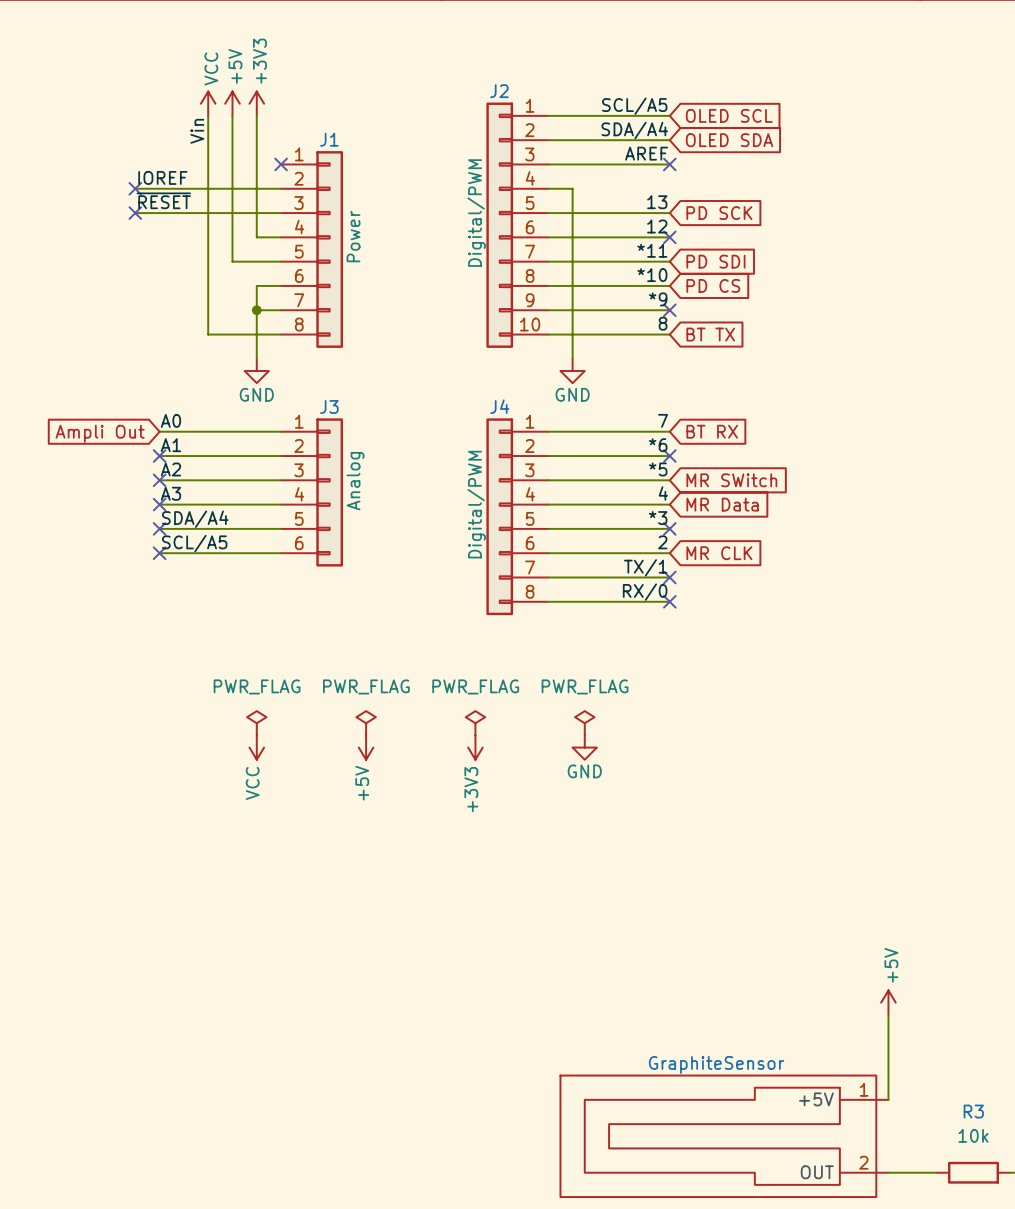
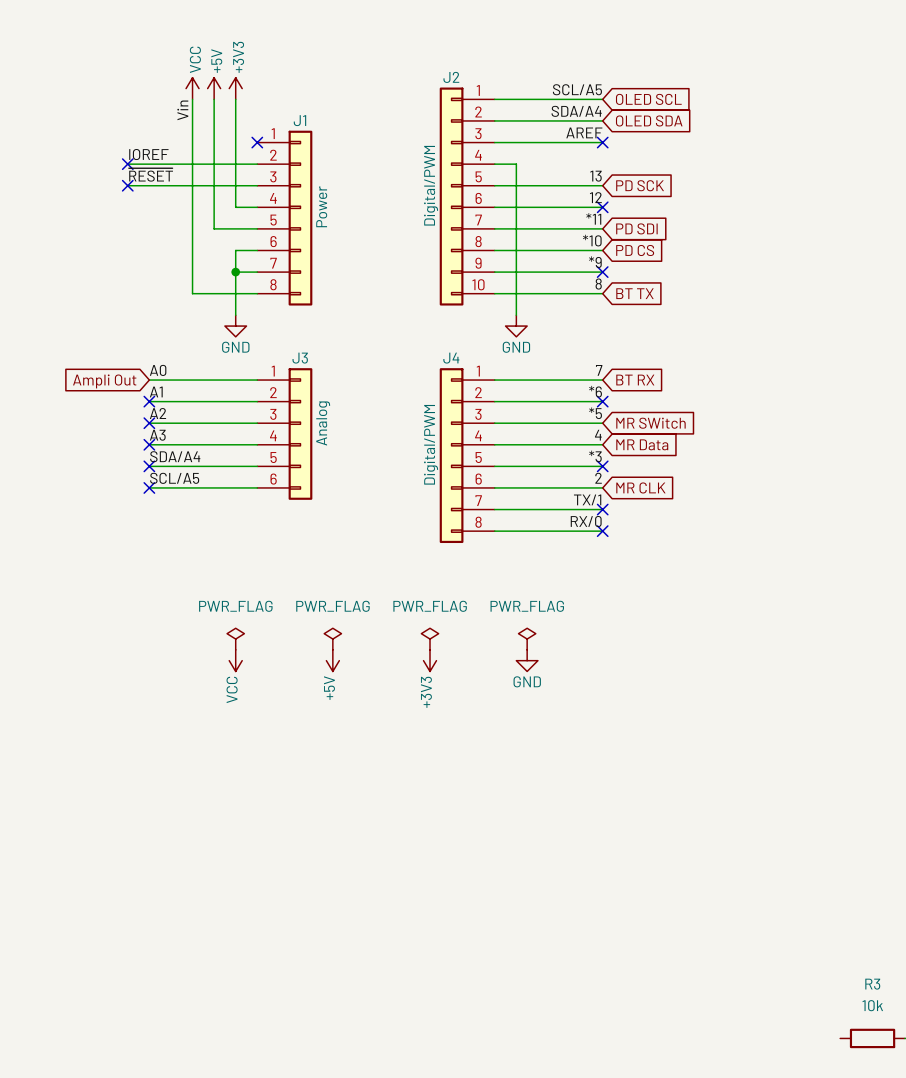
power symbol: +5V (888, 1002) -> none
wire: (888, 1014) (888, 1099) -> none
GraphiteSensor: (724, 1136) -> none
wire: (888, 1172) (937, 1172) -> none

